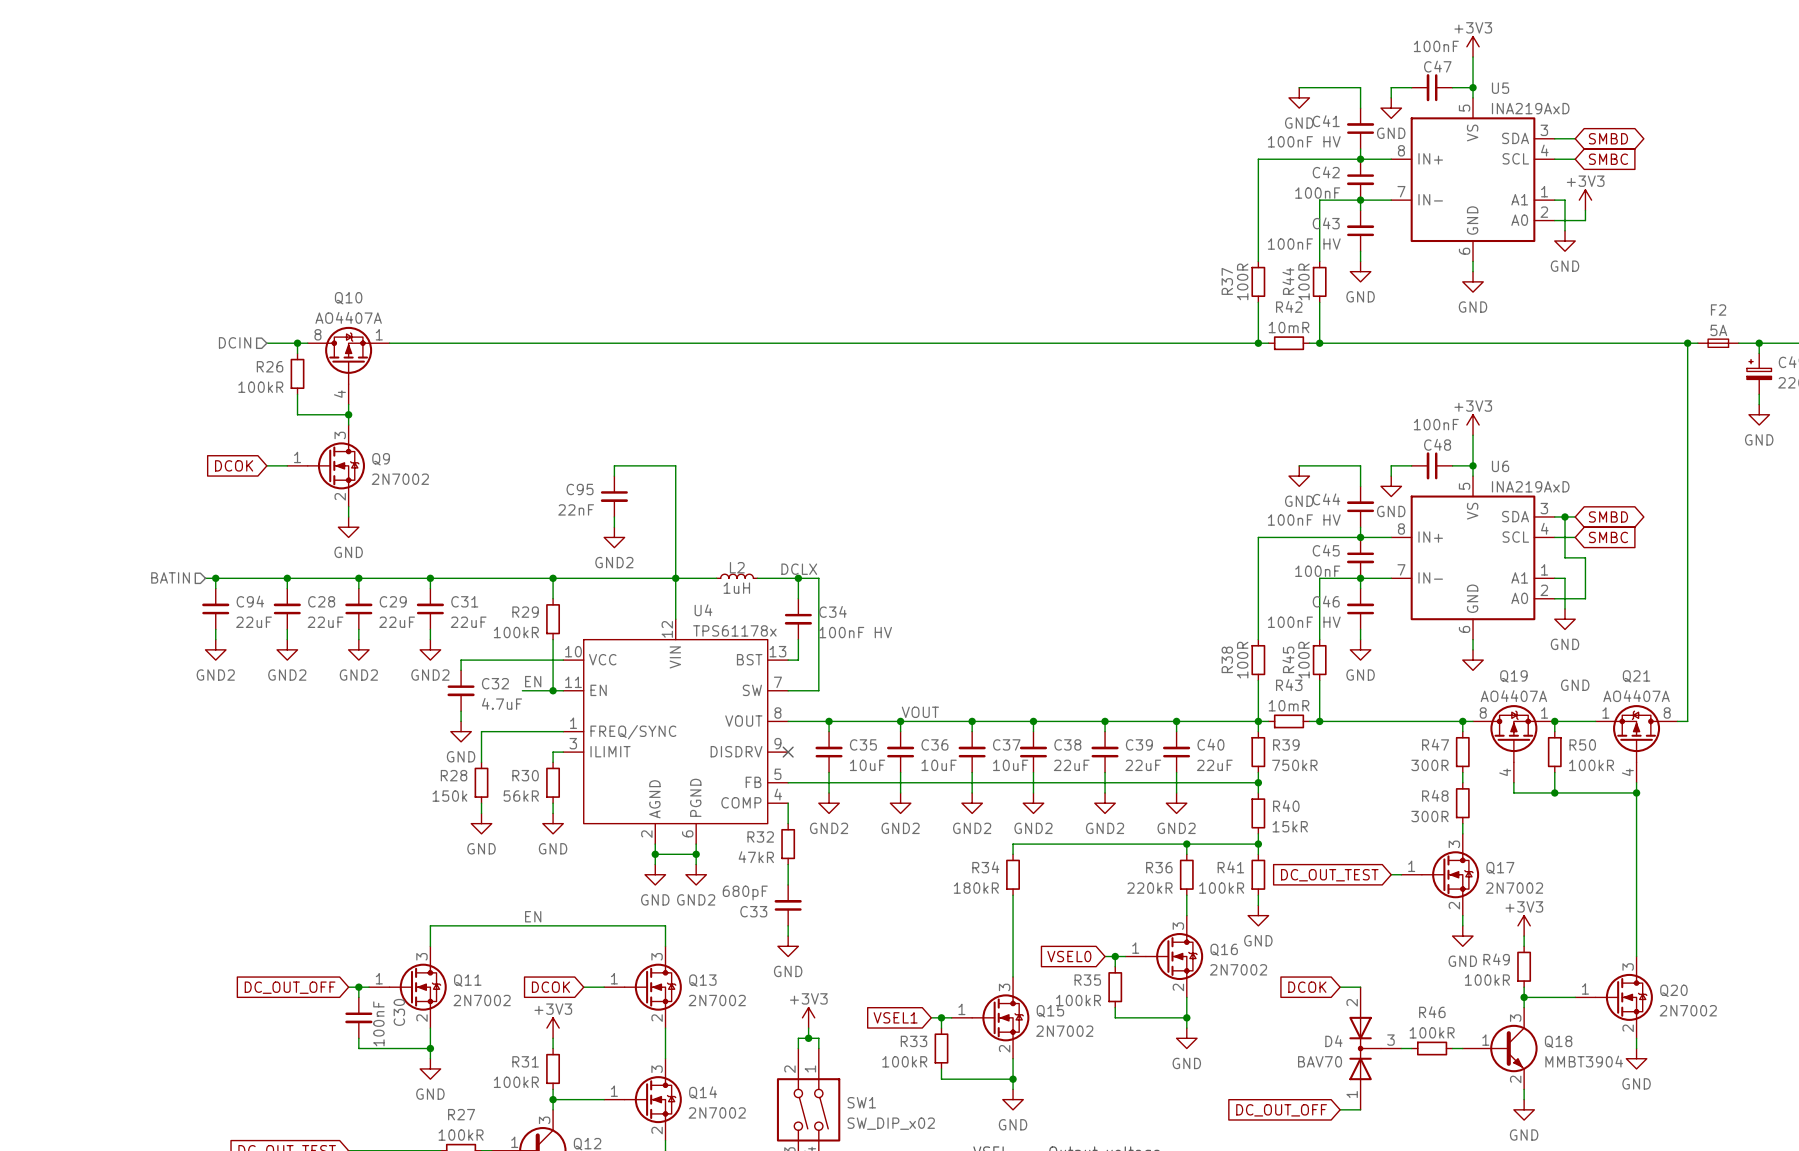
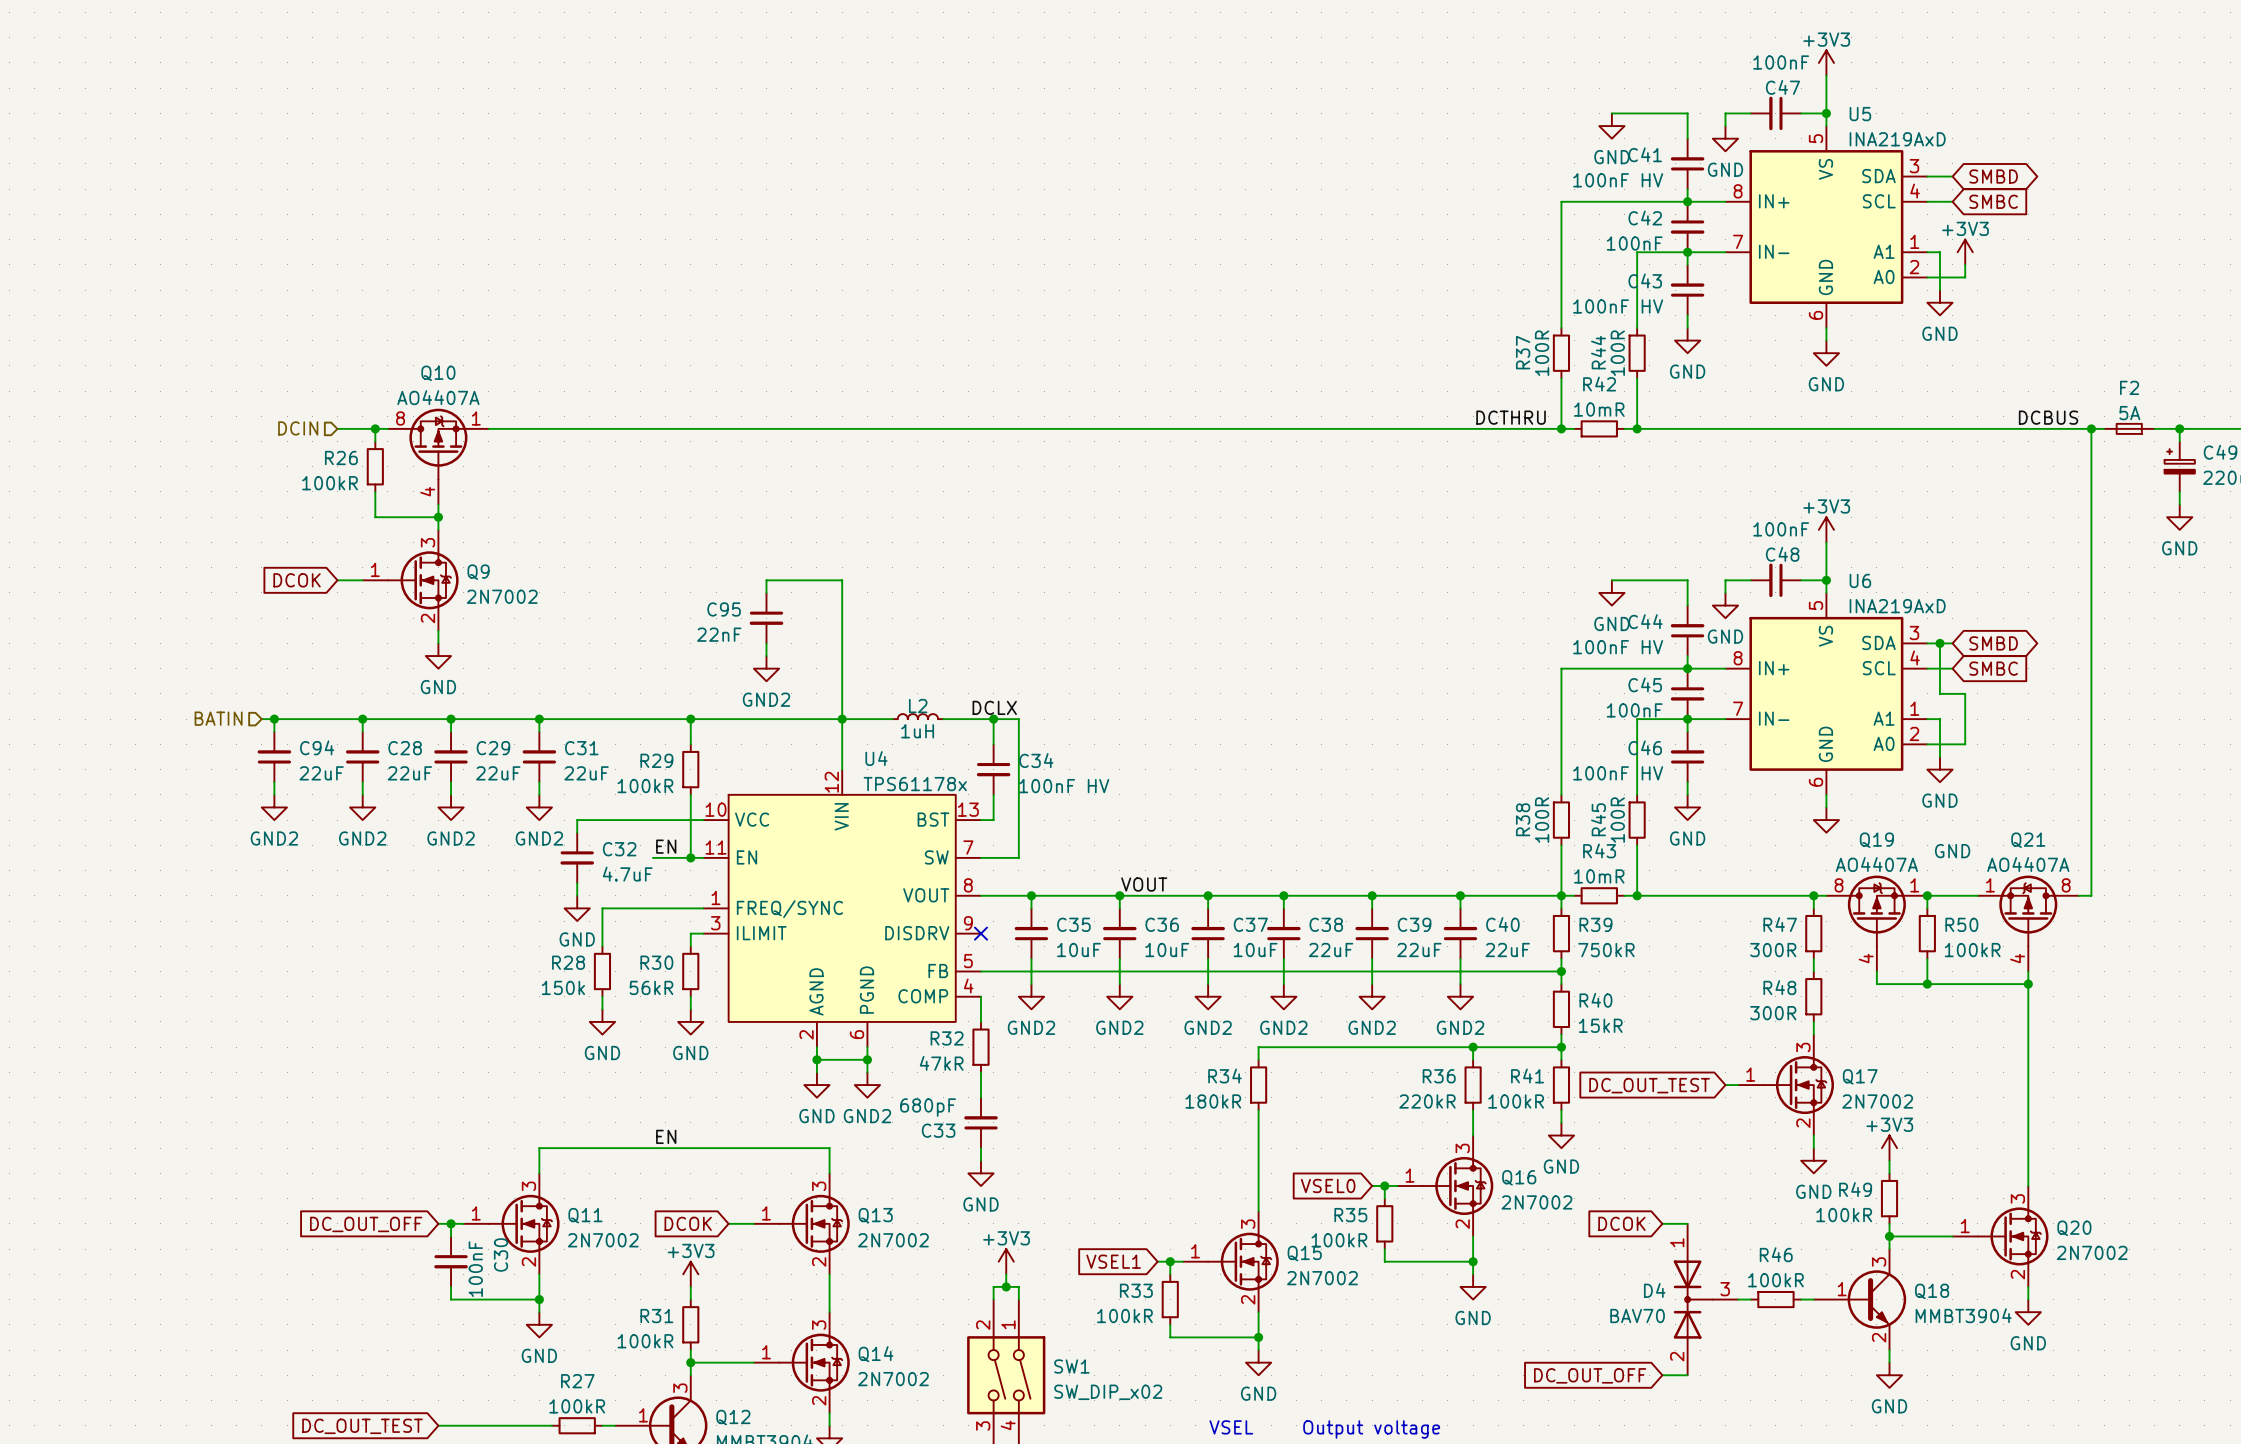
label: none -> DCTHRU (1511, 417)
label: none -> DCBUS (2048, 417)
D4 flip: as is (1365, 1048) -> up-down (1693, 1299)

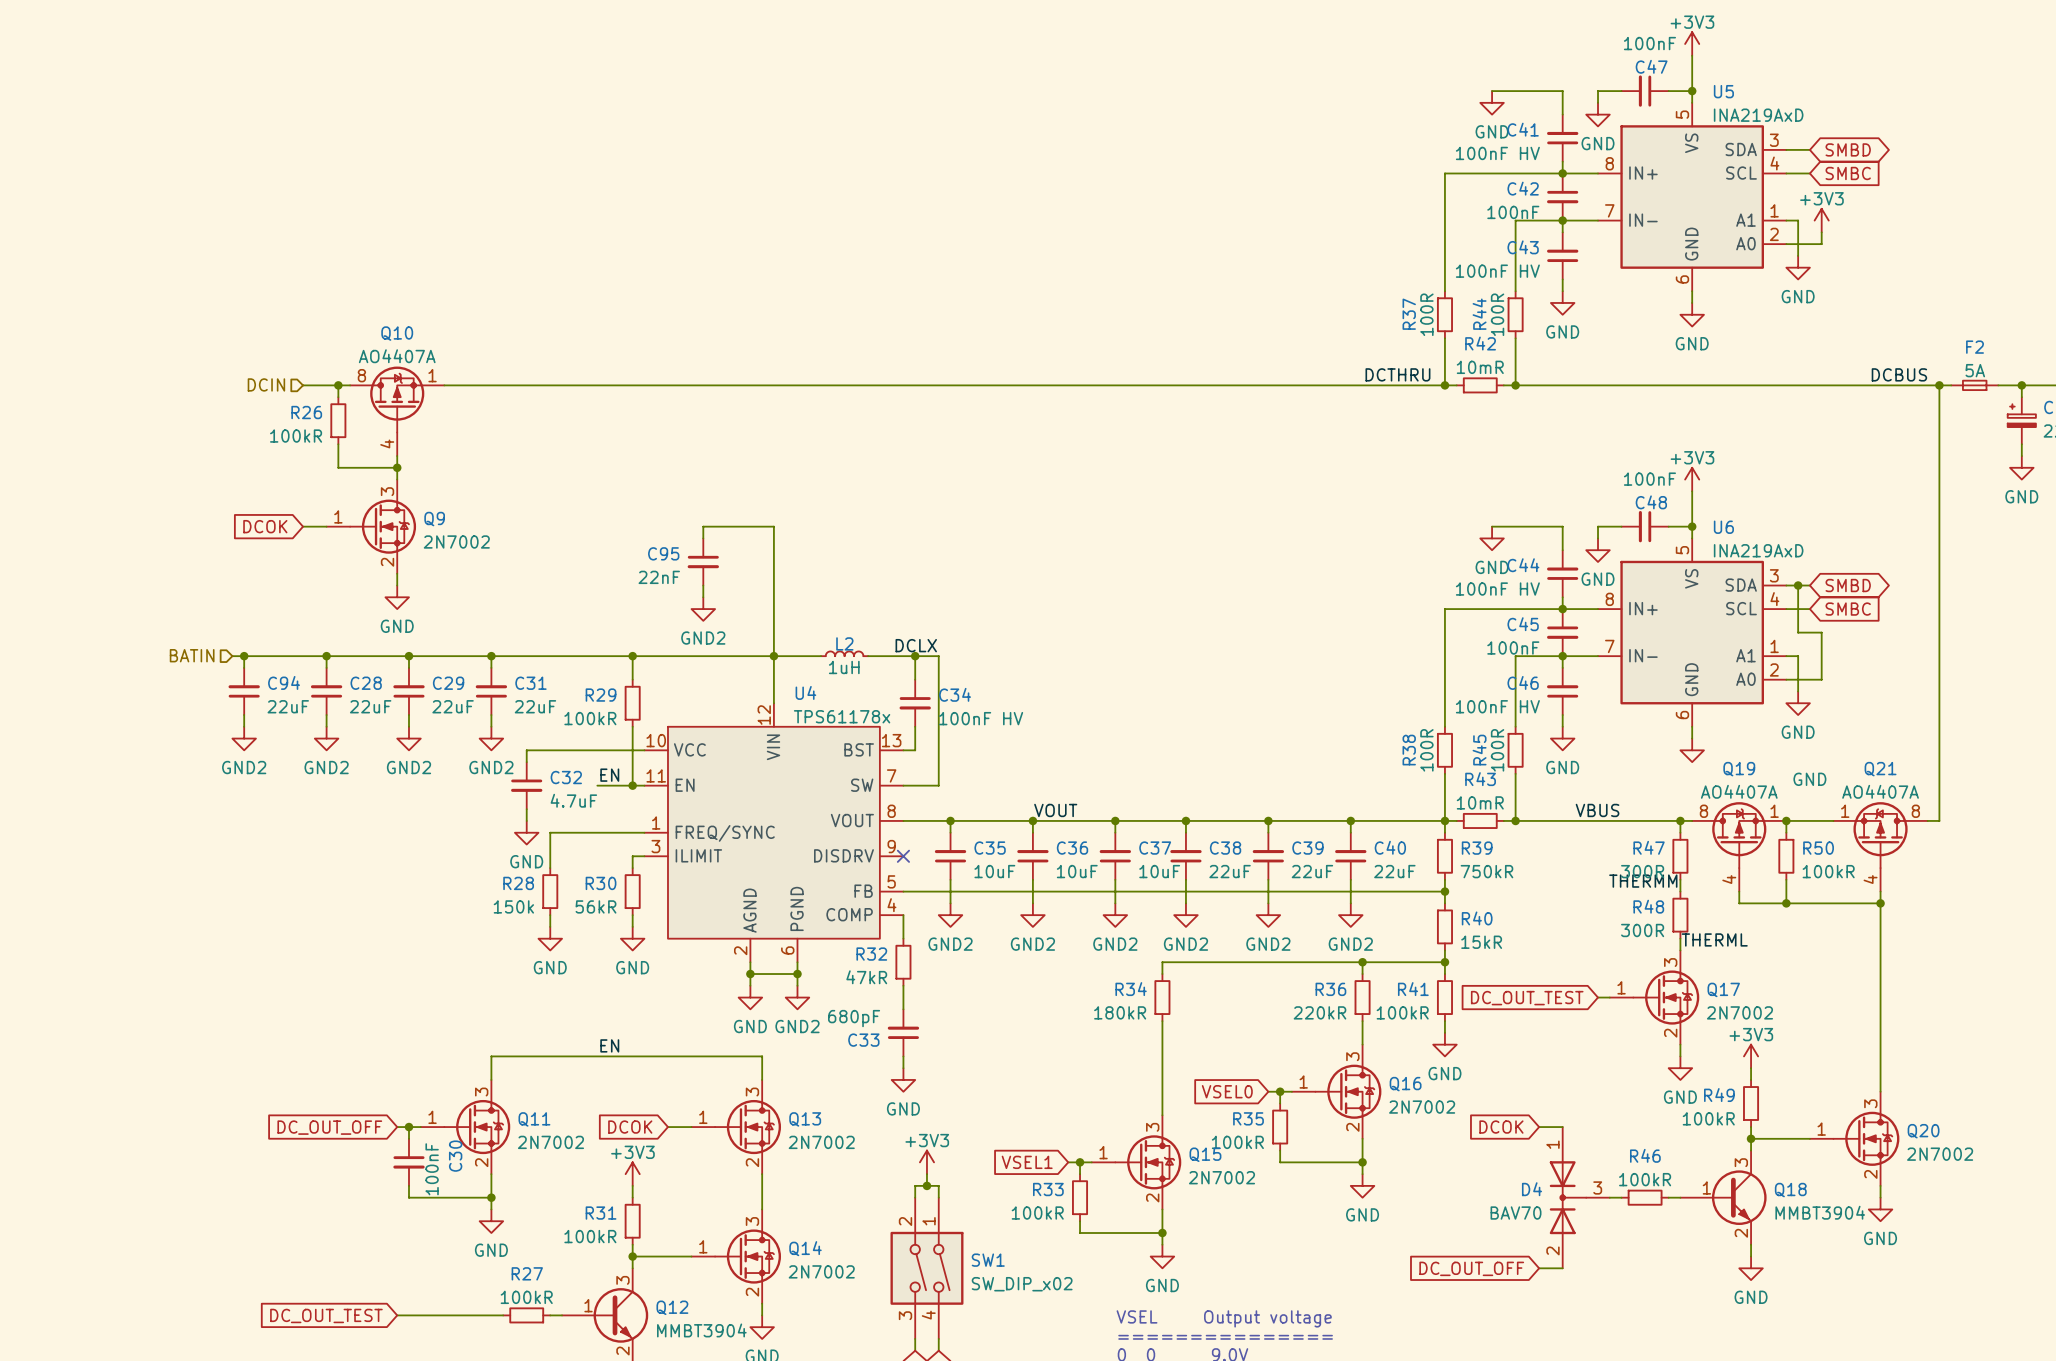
label: none -> VBUS (1597, 810)
label: none -> THERMM (1643, 881)
label: none -> THERML (1714, 939)

